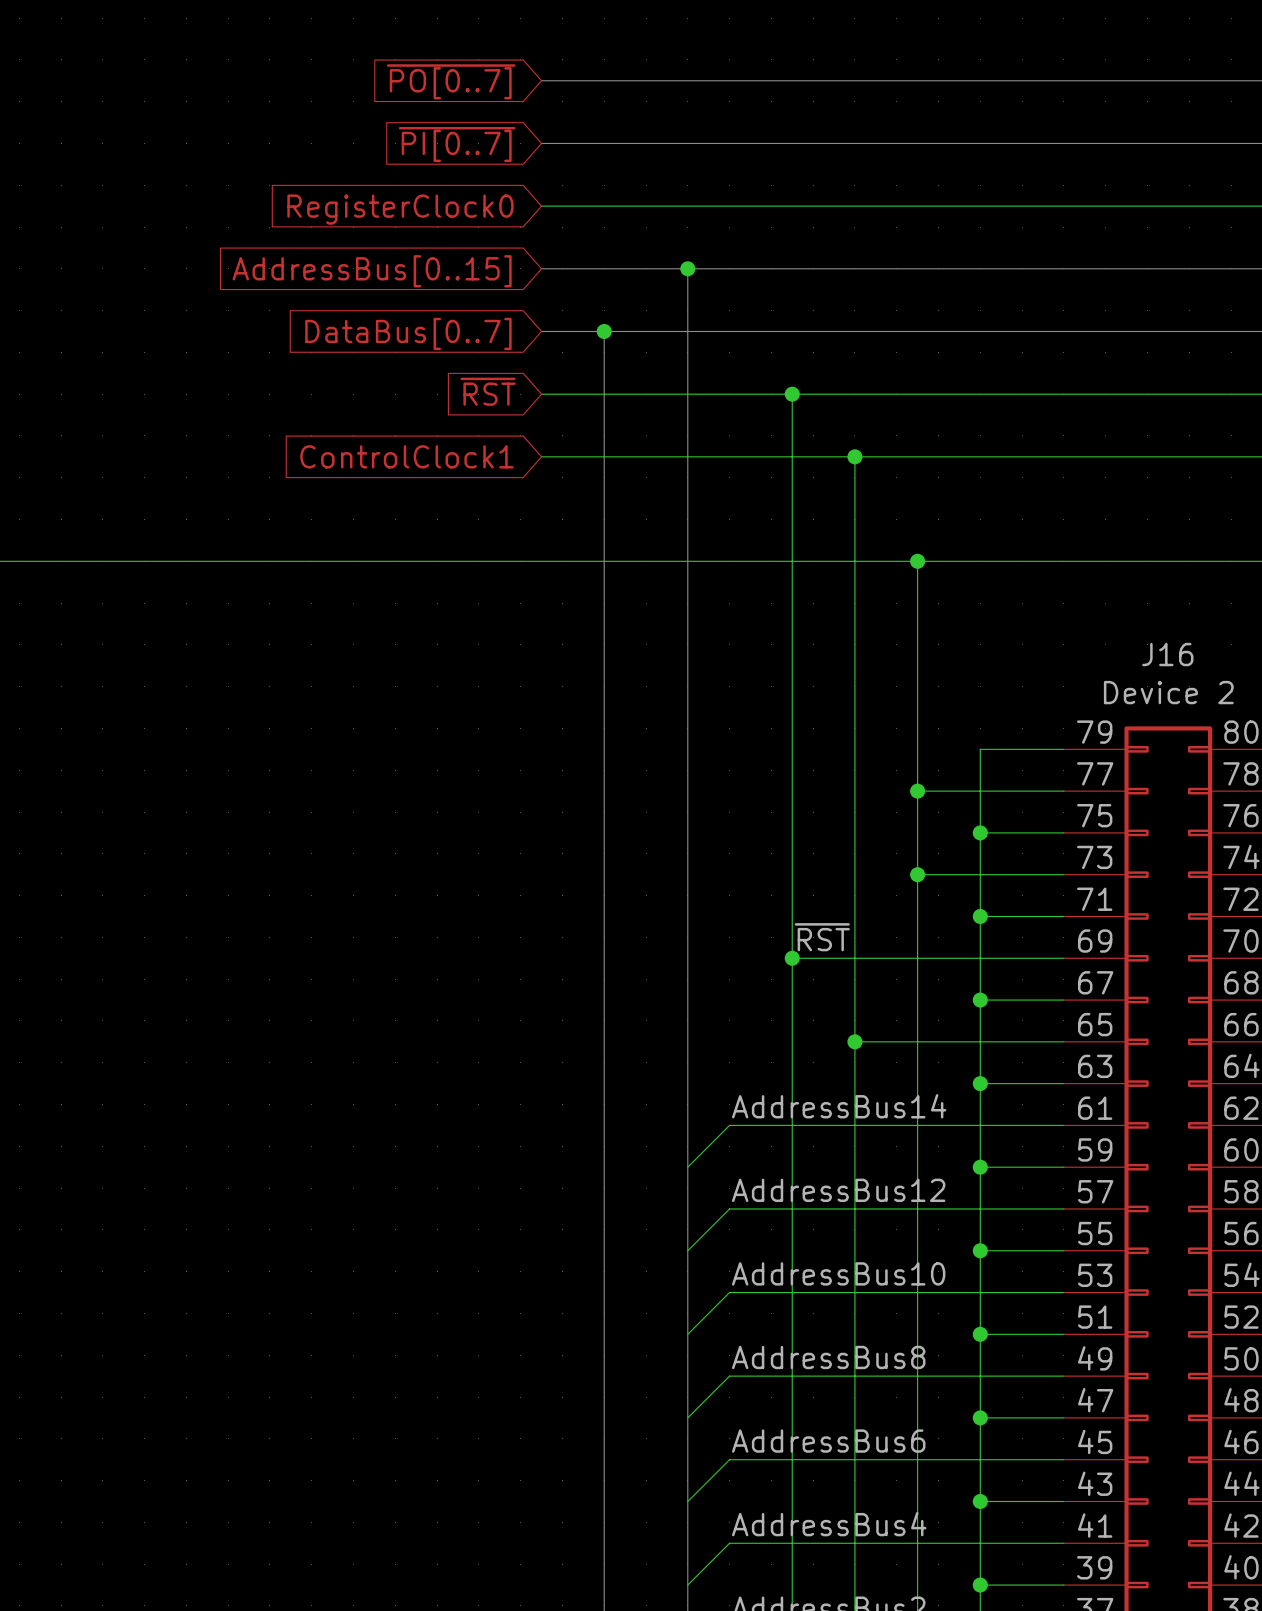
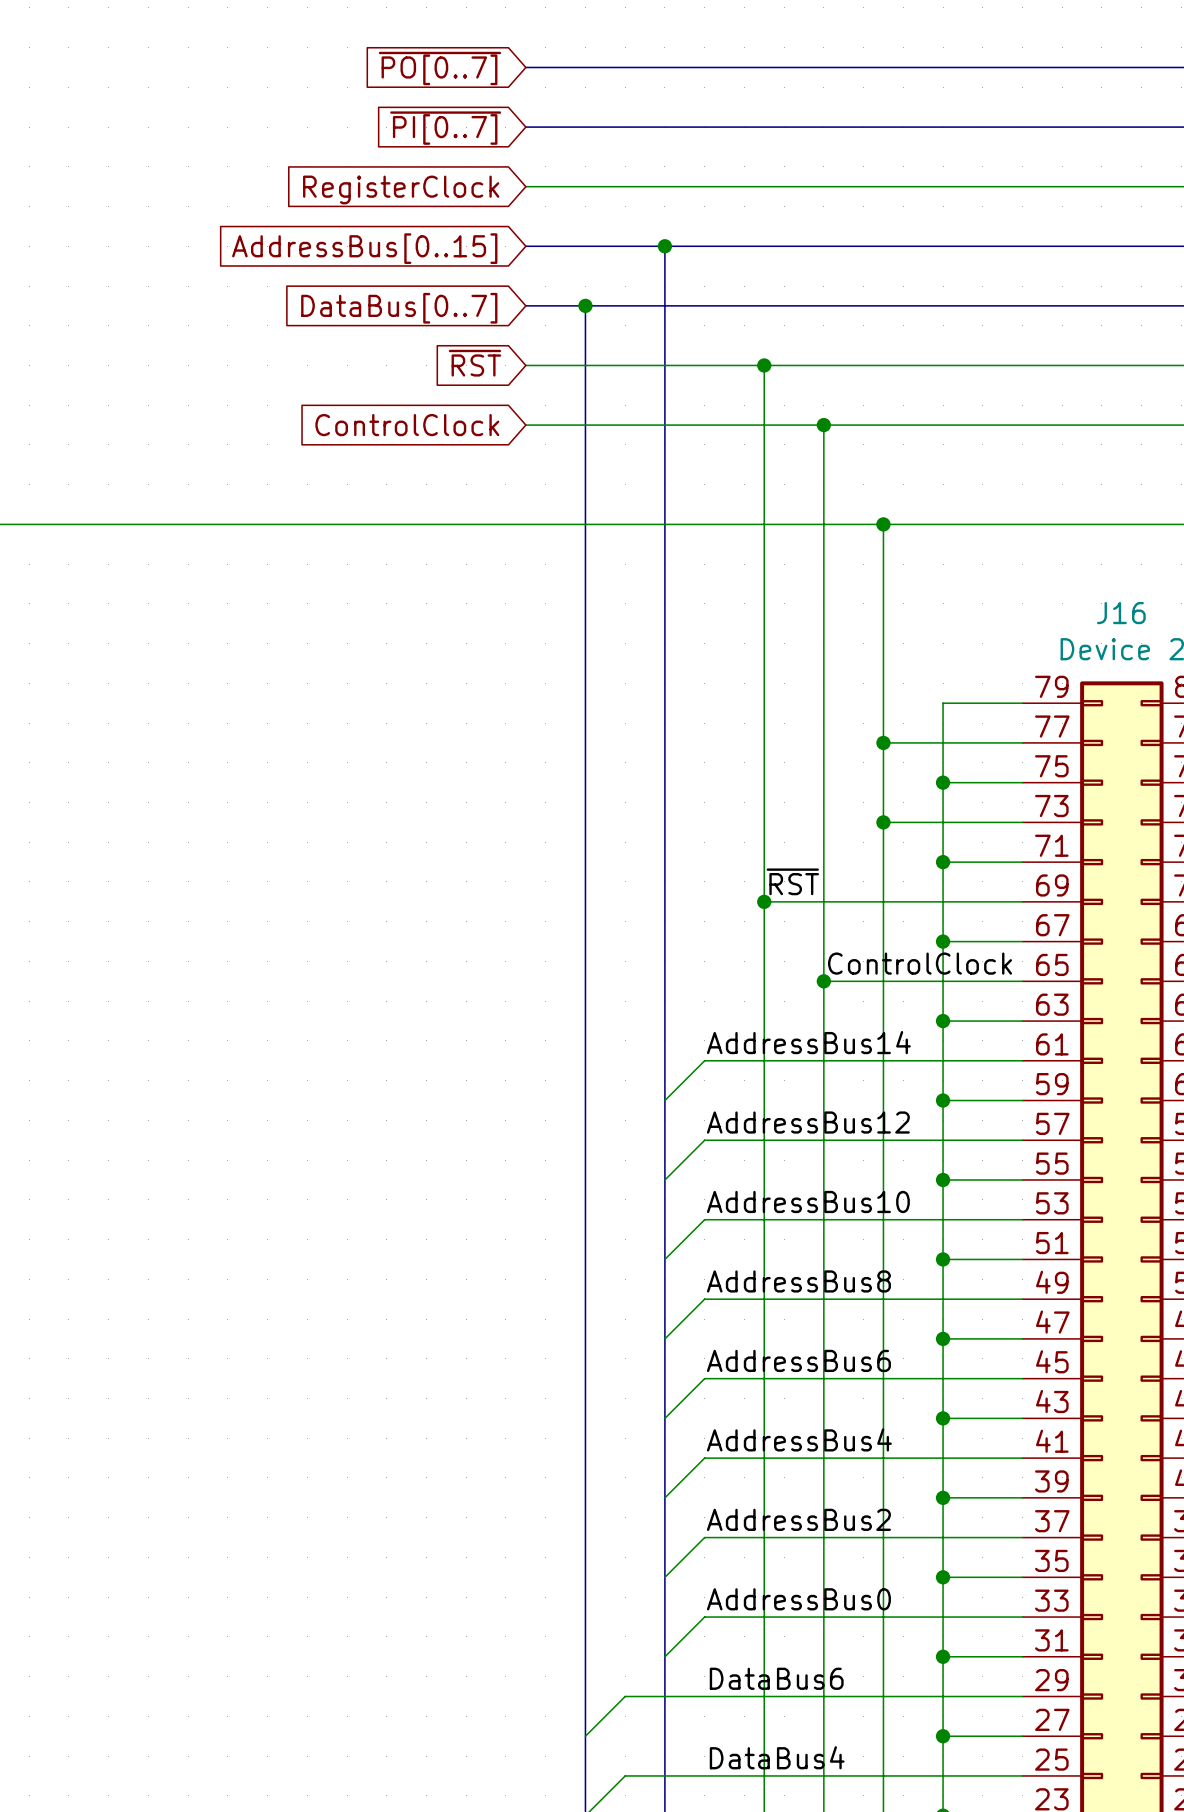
global label: RegisterClock0 (400, 209) -> RegisterClock (401, 189)
global label: ControlClock1 (406, 456) -> ControlClock (407, 425)
label: none -> ControlClock (920, 963)

